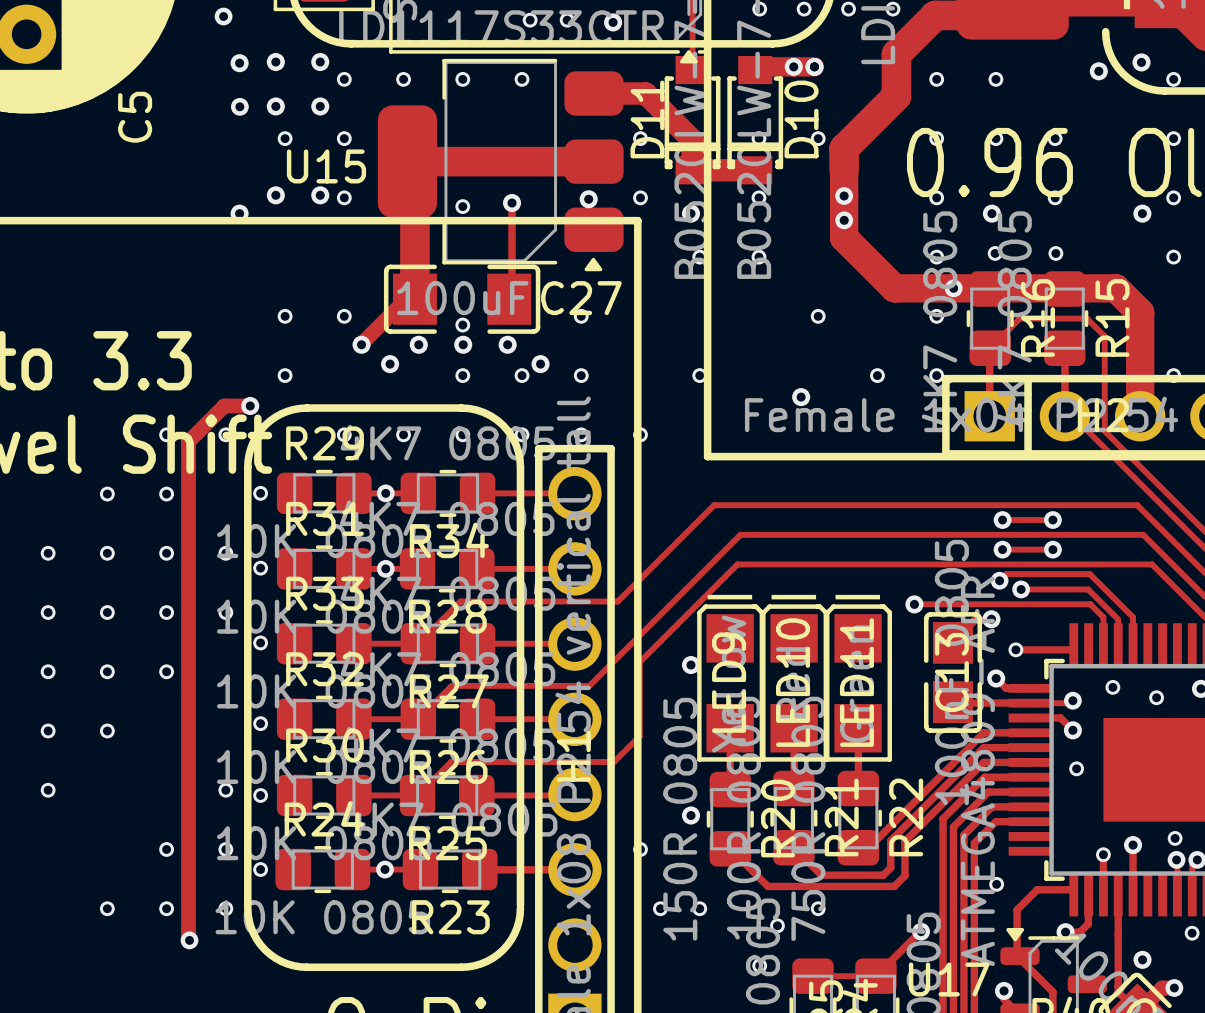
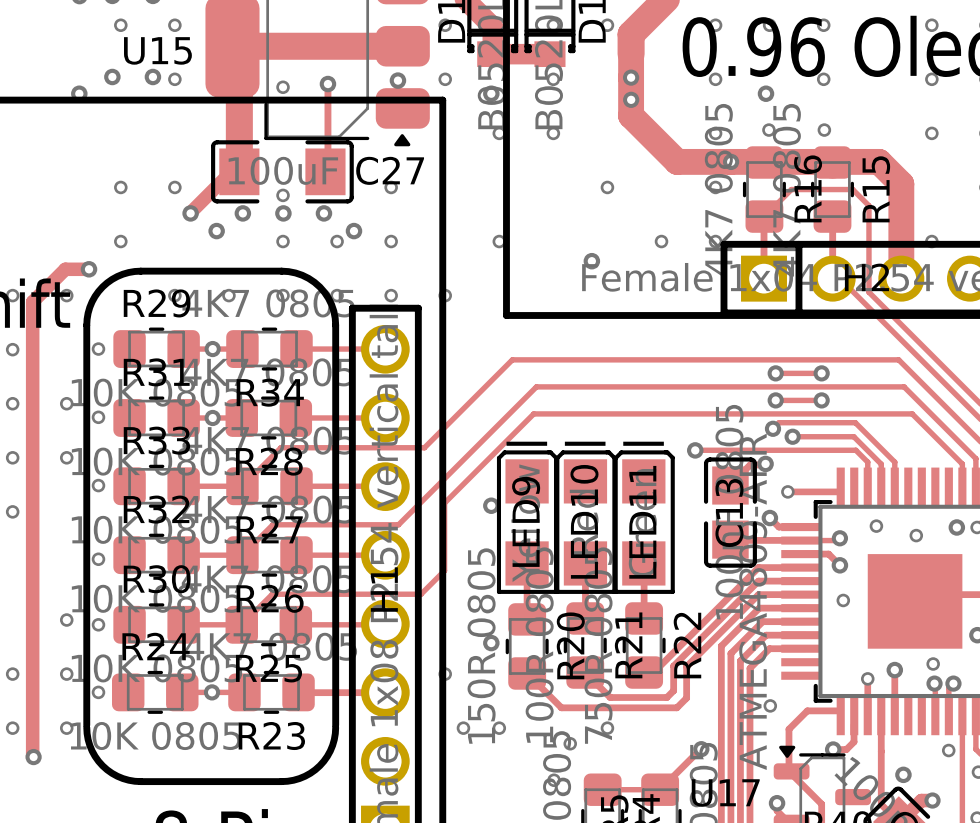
via: (1142, 213) -> none

